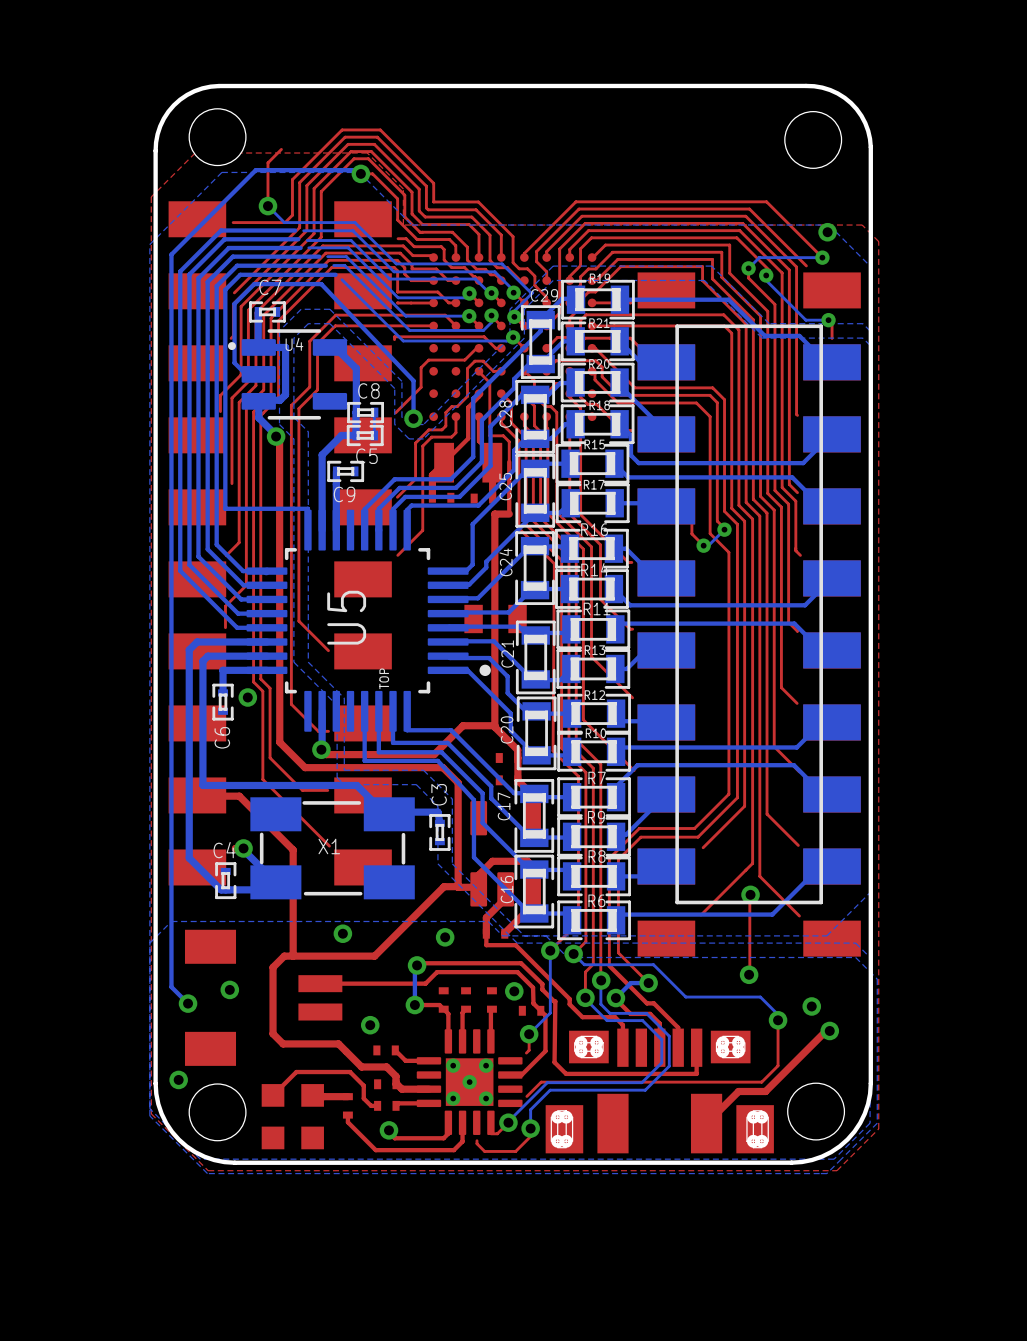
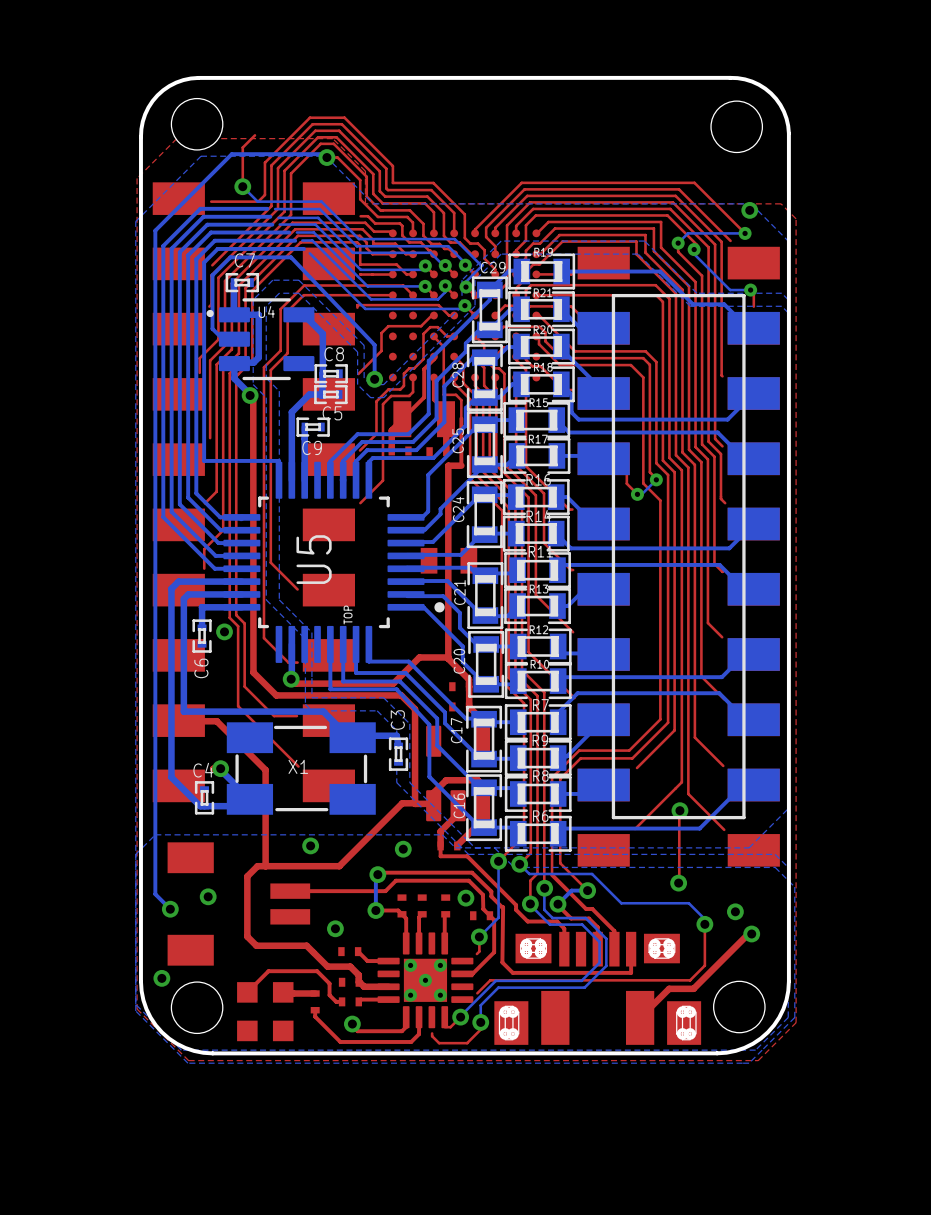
bottom track: (374, 412) (374, 435) -> none

